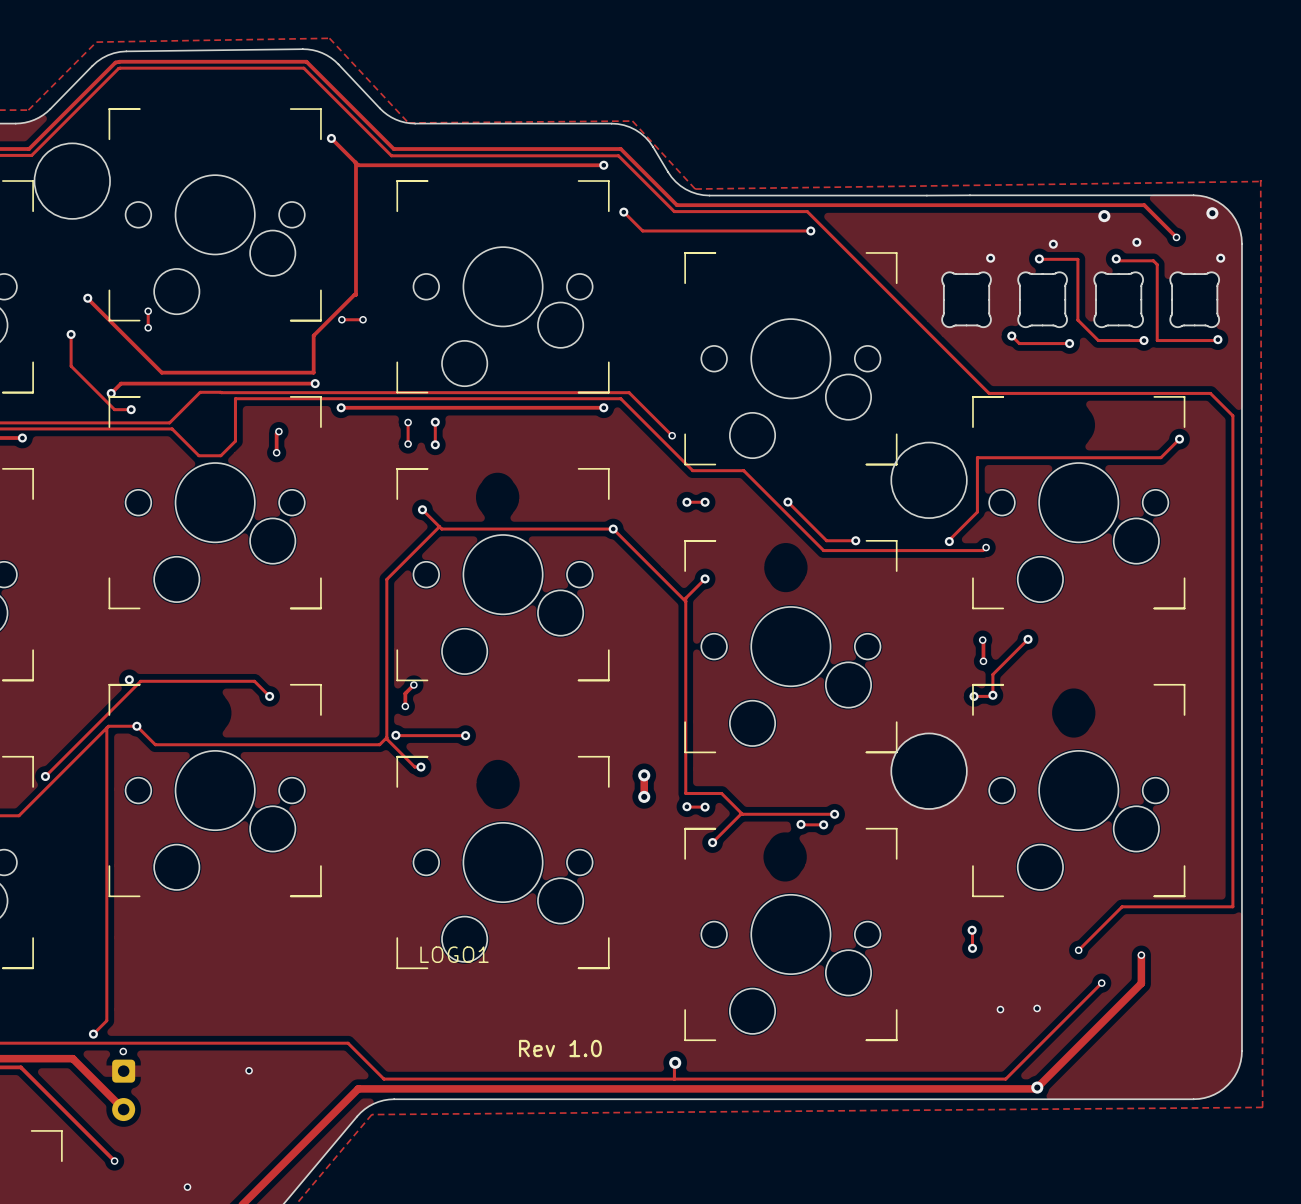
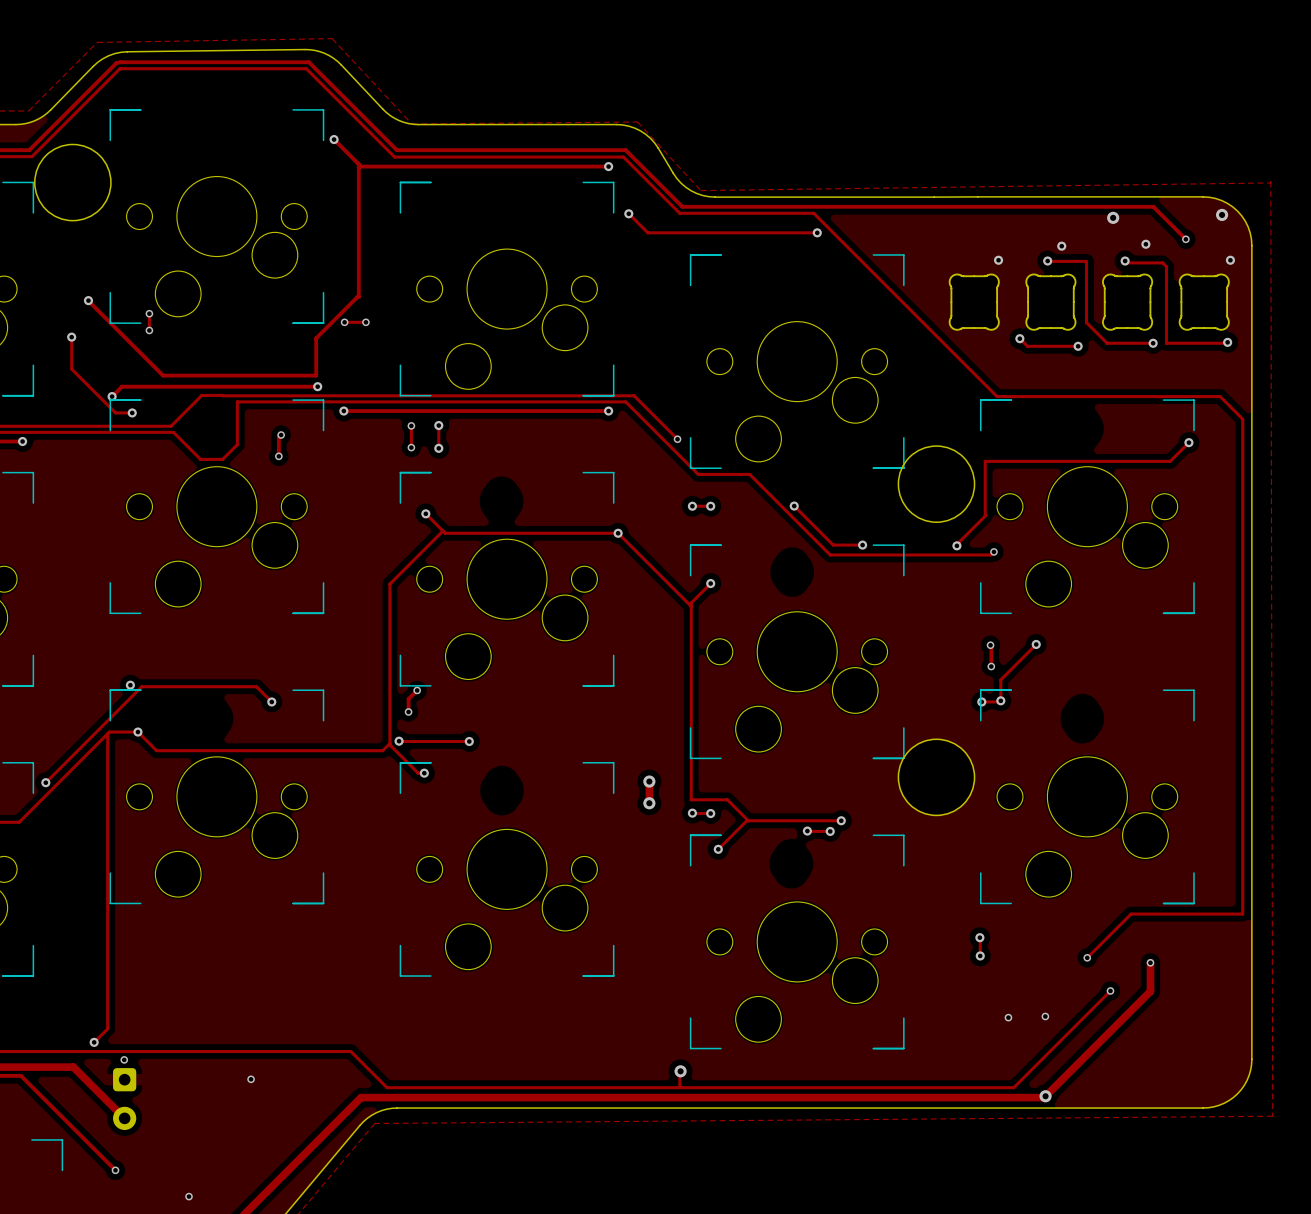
LOGO1: (454, 954) -> none
text: Rev 1.0 (560, 1048) -> none

